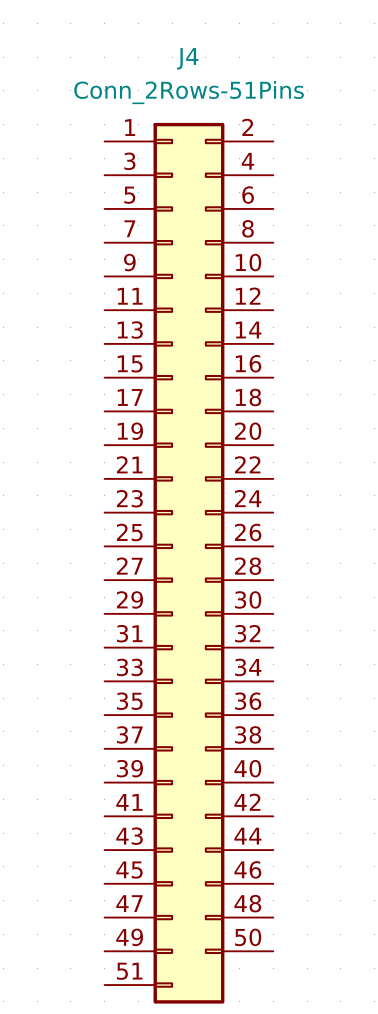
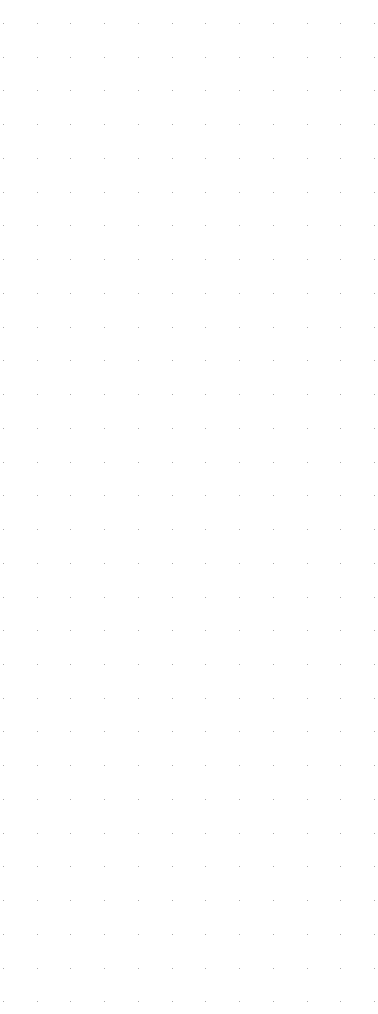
J4: Conn_2Rows-51Pins (188, 563) -> none

